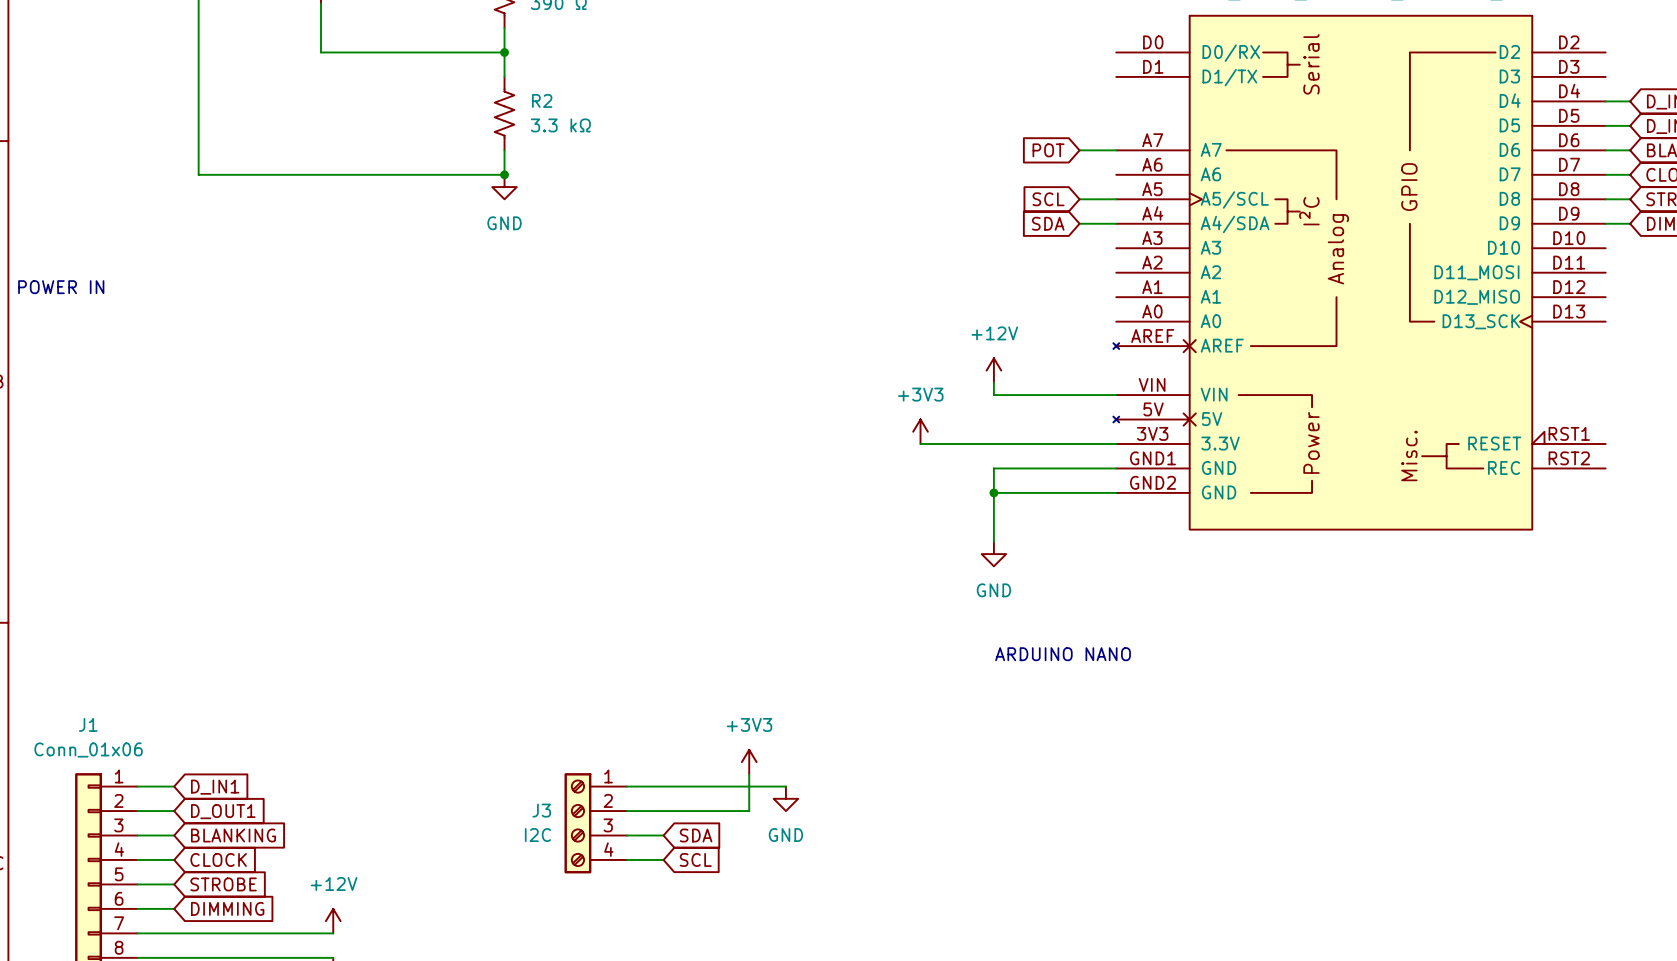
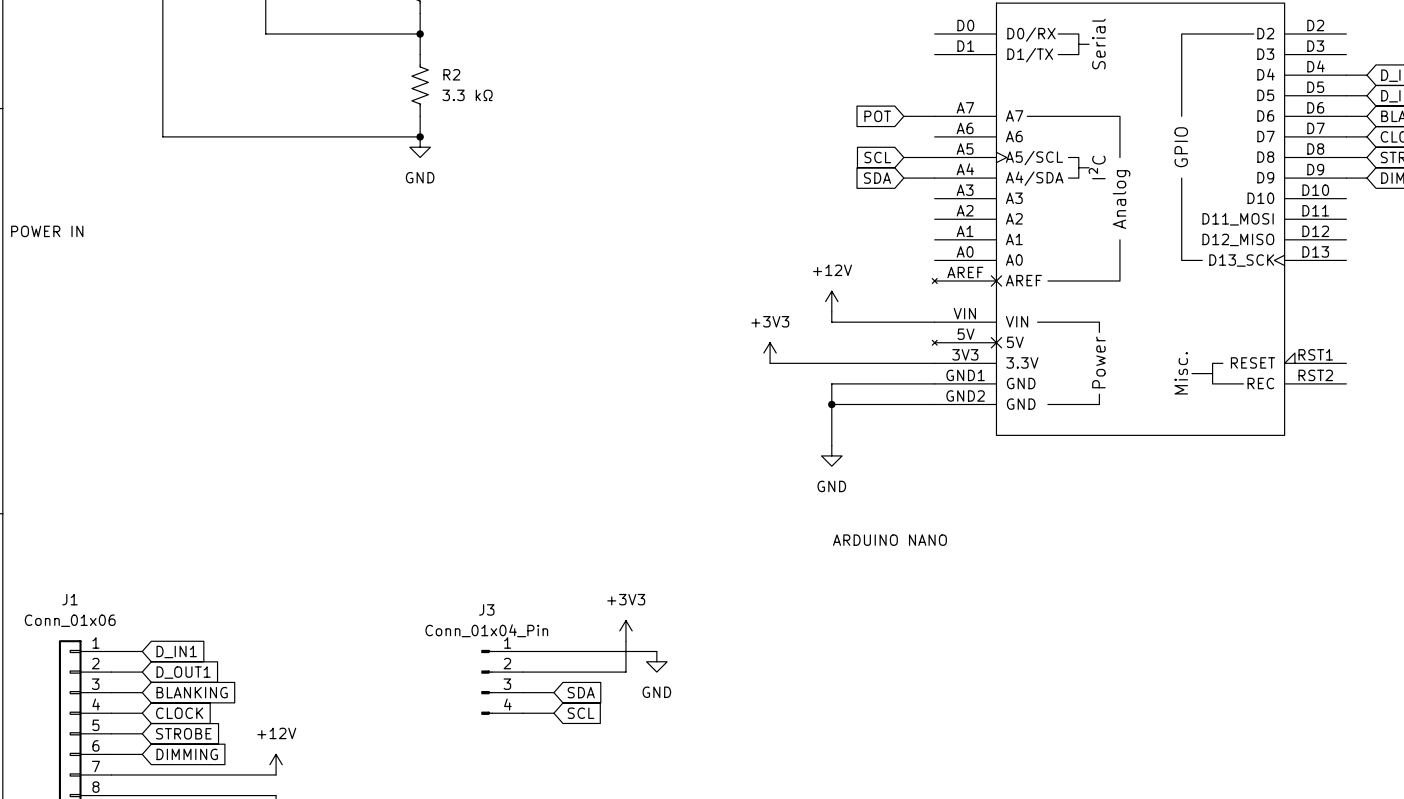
J3 symbol: [564, 773, 627, 874] -> [481, 649, 524, 715]
J3 name position: J3 (541, 810) -> J3 (486, 609)
J3 value: I2C (537, 835) -> Conn_01x04_Pin (486, 630)

